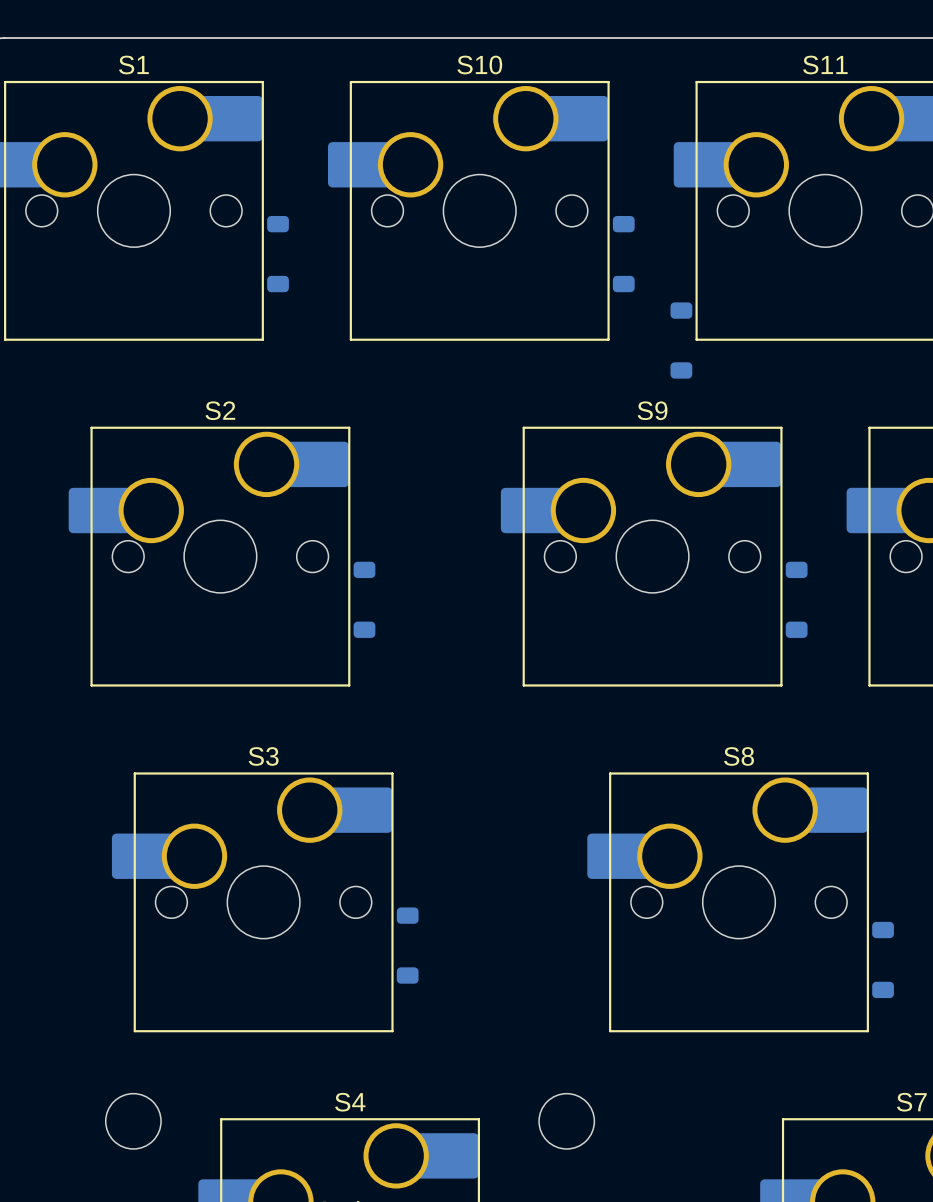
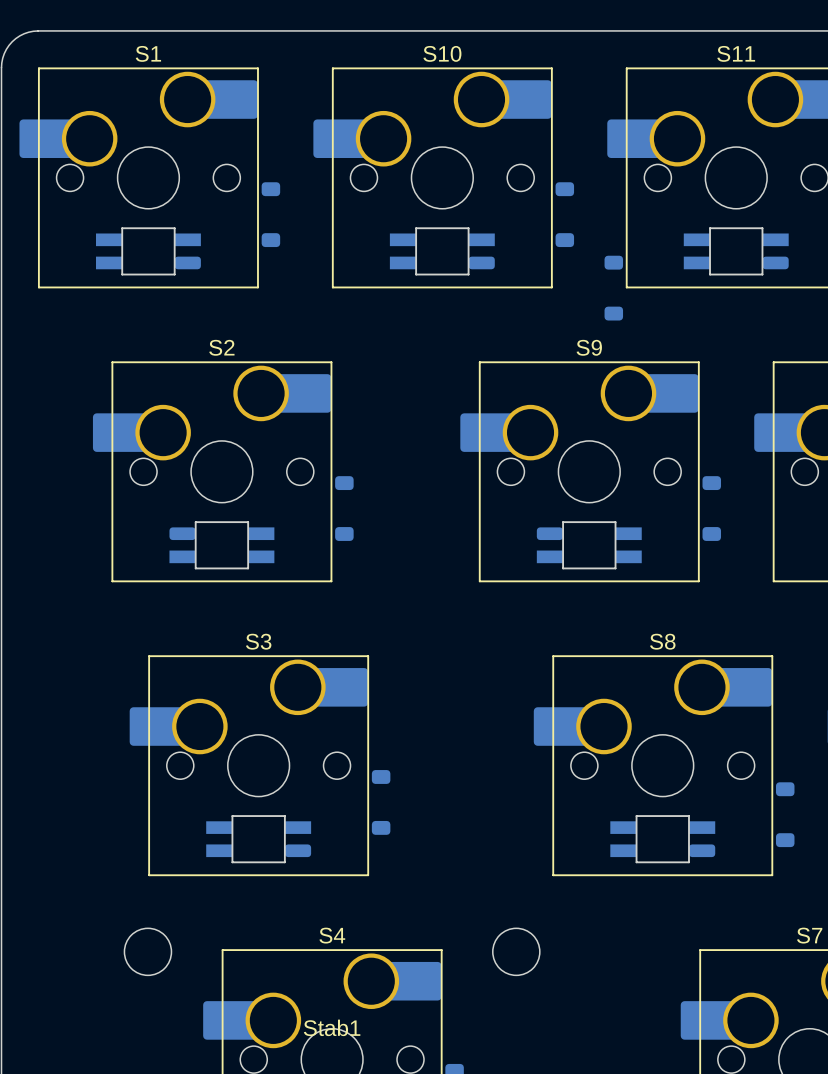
part: none -> (148, 251)
part: none -> (442, 251)
part: none -> (736, 251)
part: none -> (221, 545)
part: none -> (589, 545)
part: none -> (258, 839)
part: none -> (662, 839)

